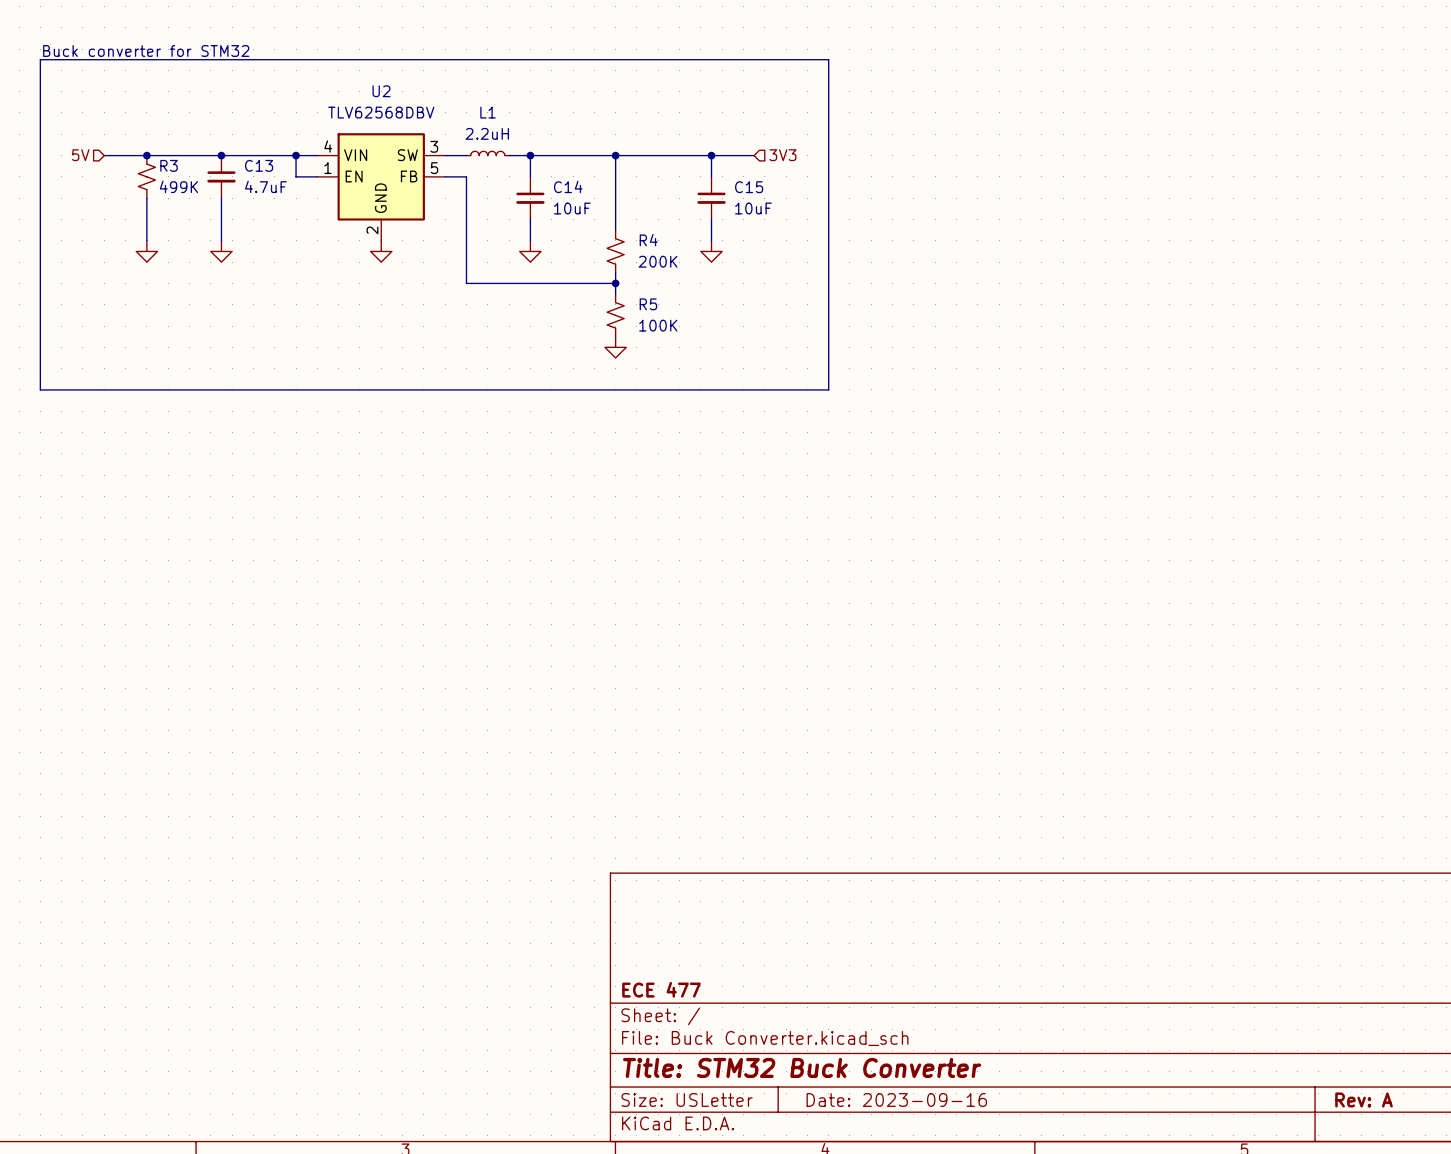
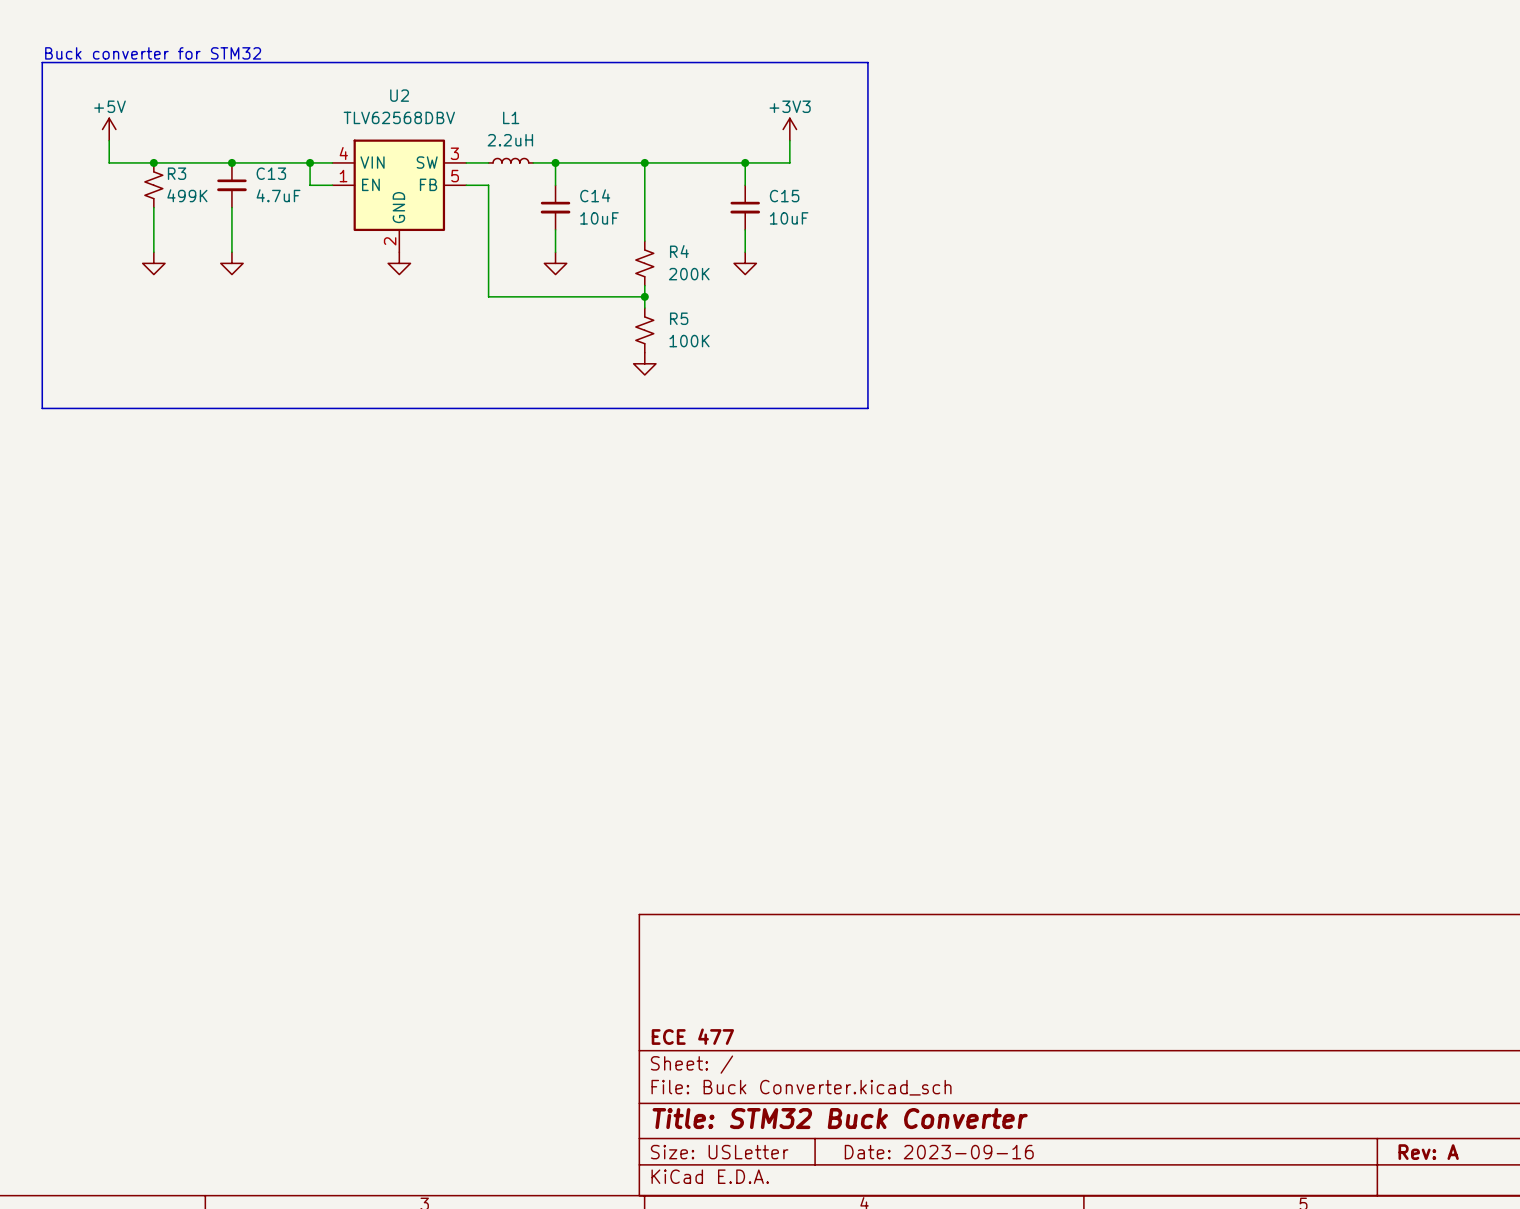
power symbol: none -> +5V (109, 129)
power symbol: none -> +3V3 (789, 129)
wire: none -> (109, 140) (109, 162)
wire: none -> (789, 140) (789, 162)
hierarchical label: 5V (80, 155) -> none
hierarchical label: 3V3 (782, 155) -> none

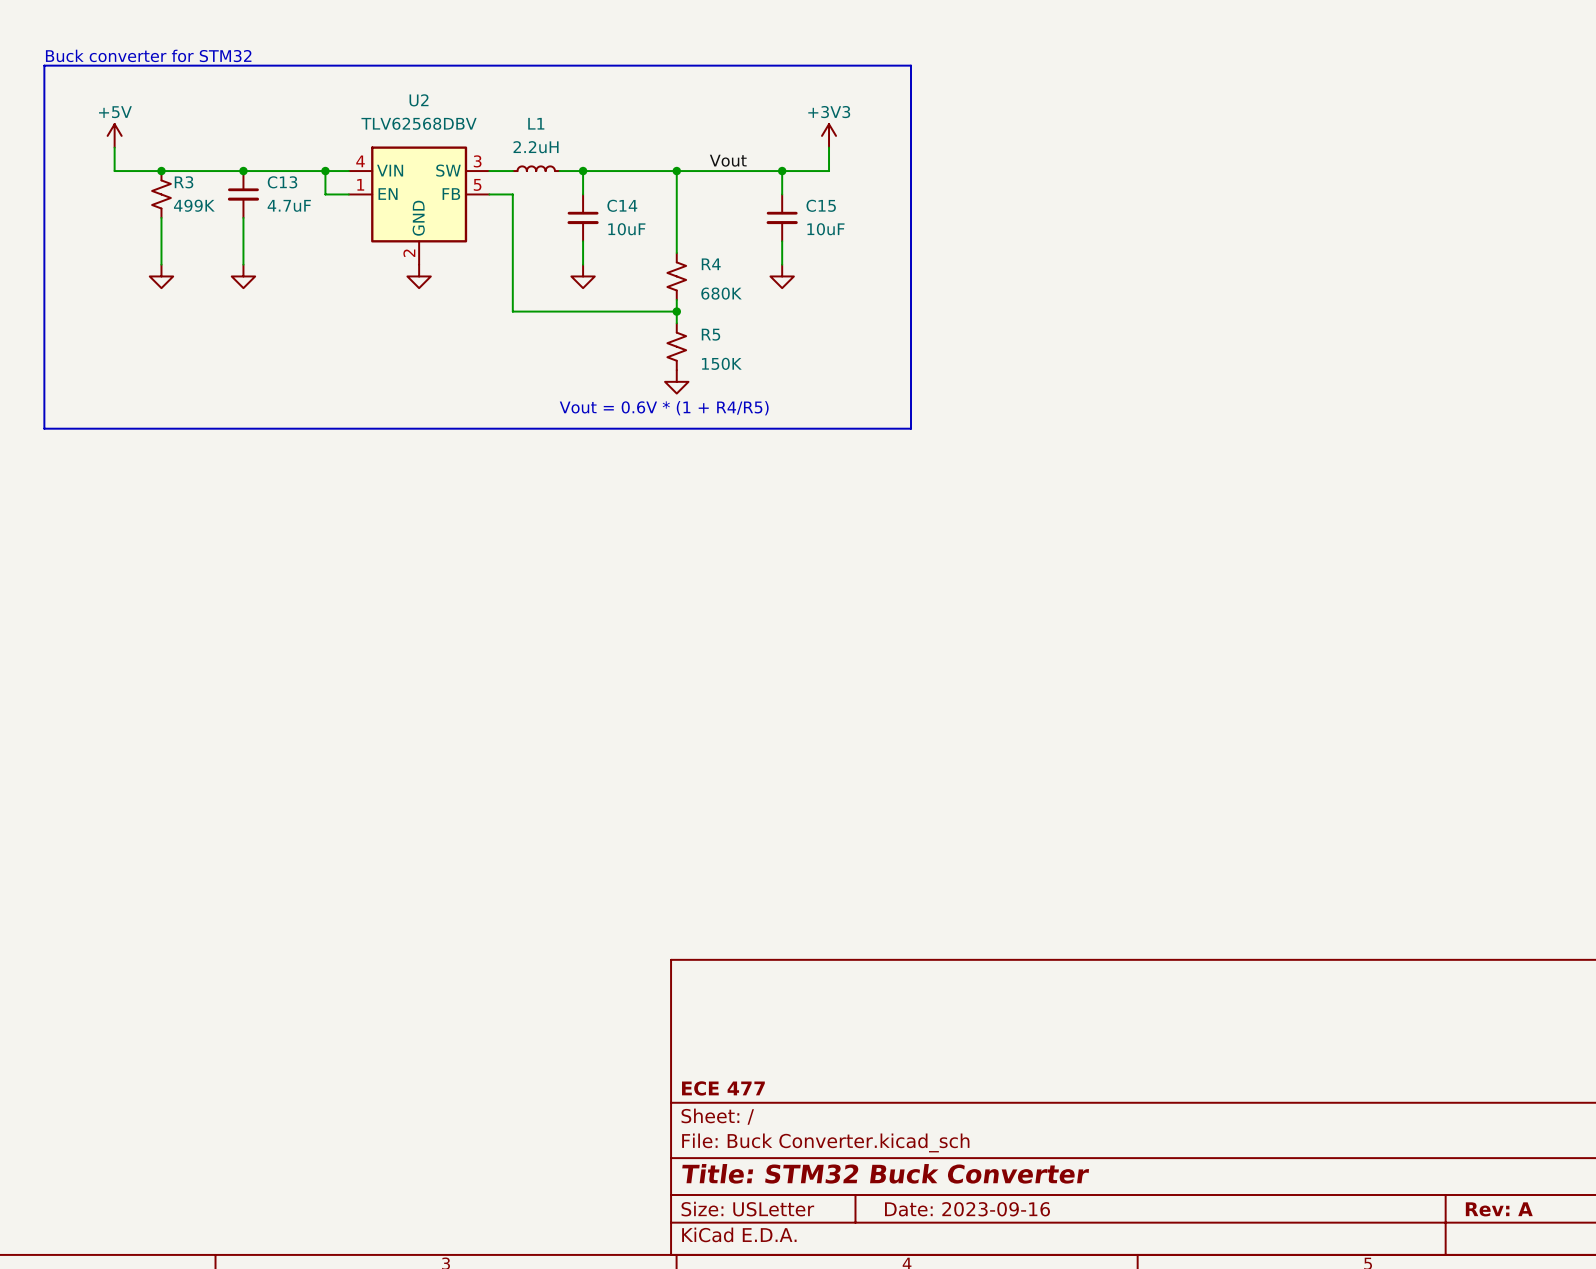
label: none -> Vout (728, 160)
R4 value: 200K (689, 274) -> 680K (721, 293)
R5 value: 100K (689, 341) -> 150K (721, 363)
text: none -> Vout = 0.6V * (1 + R4/R5) (664, 408)

